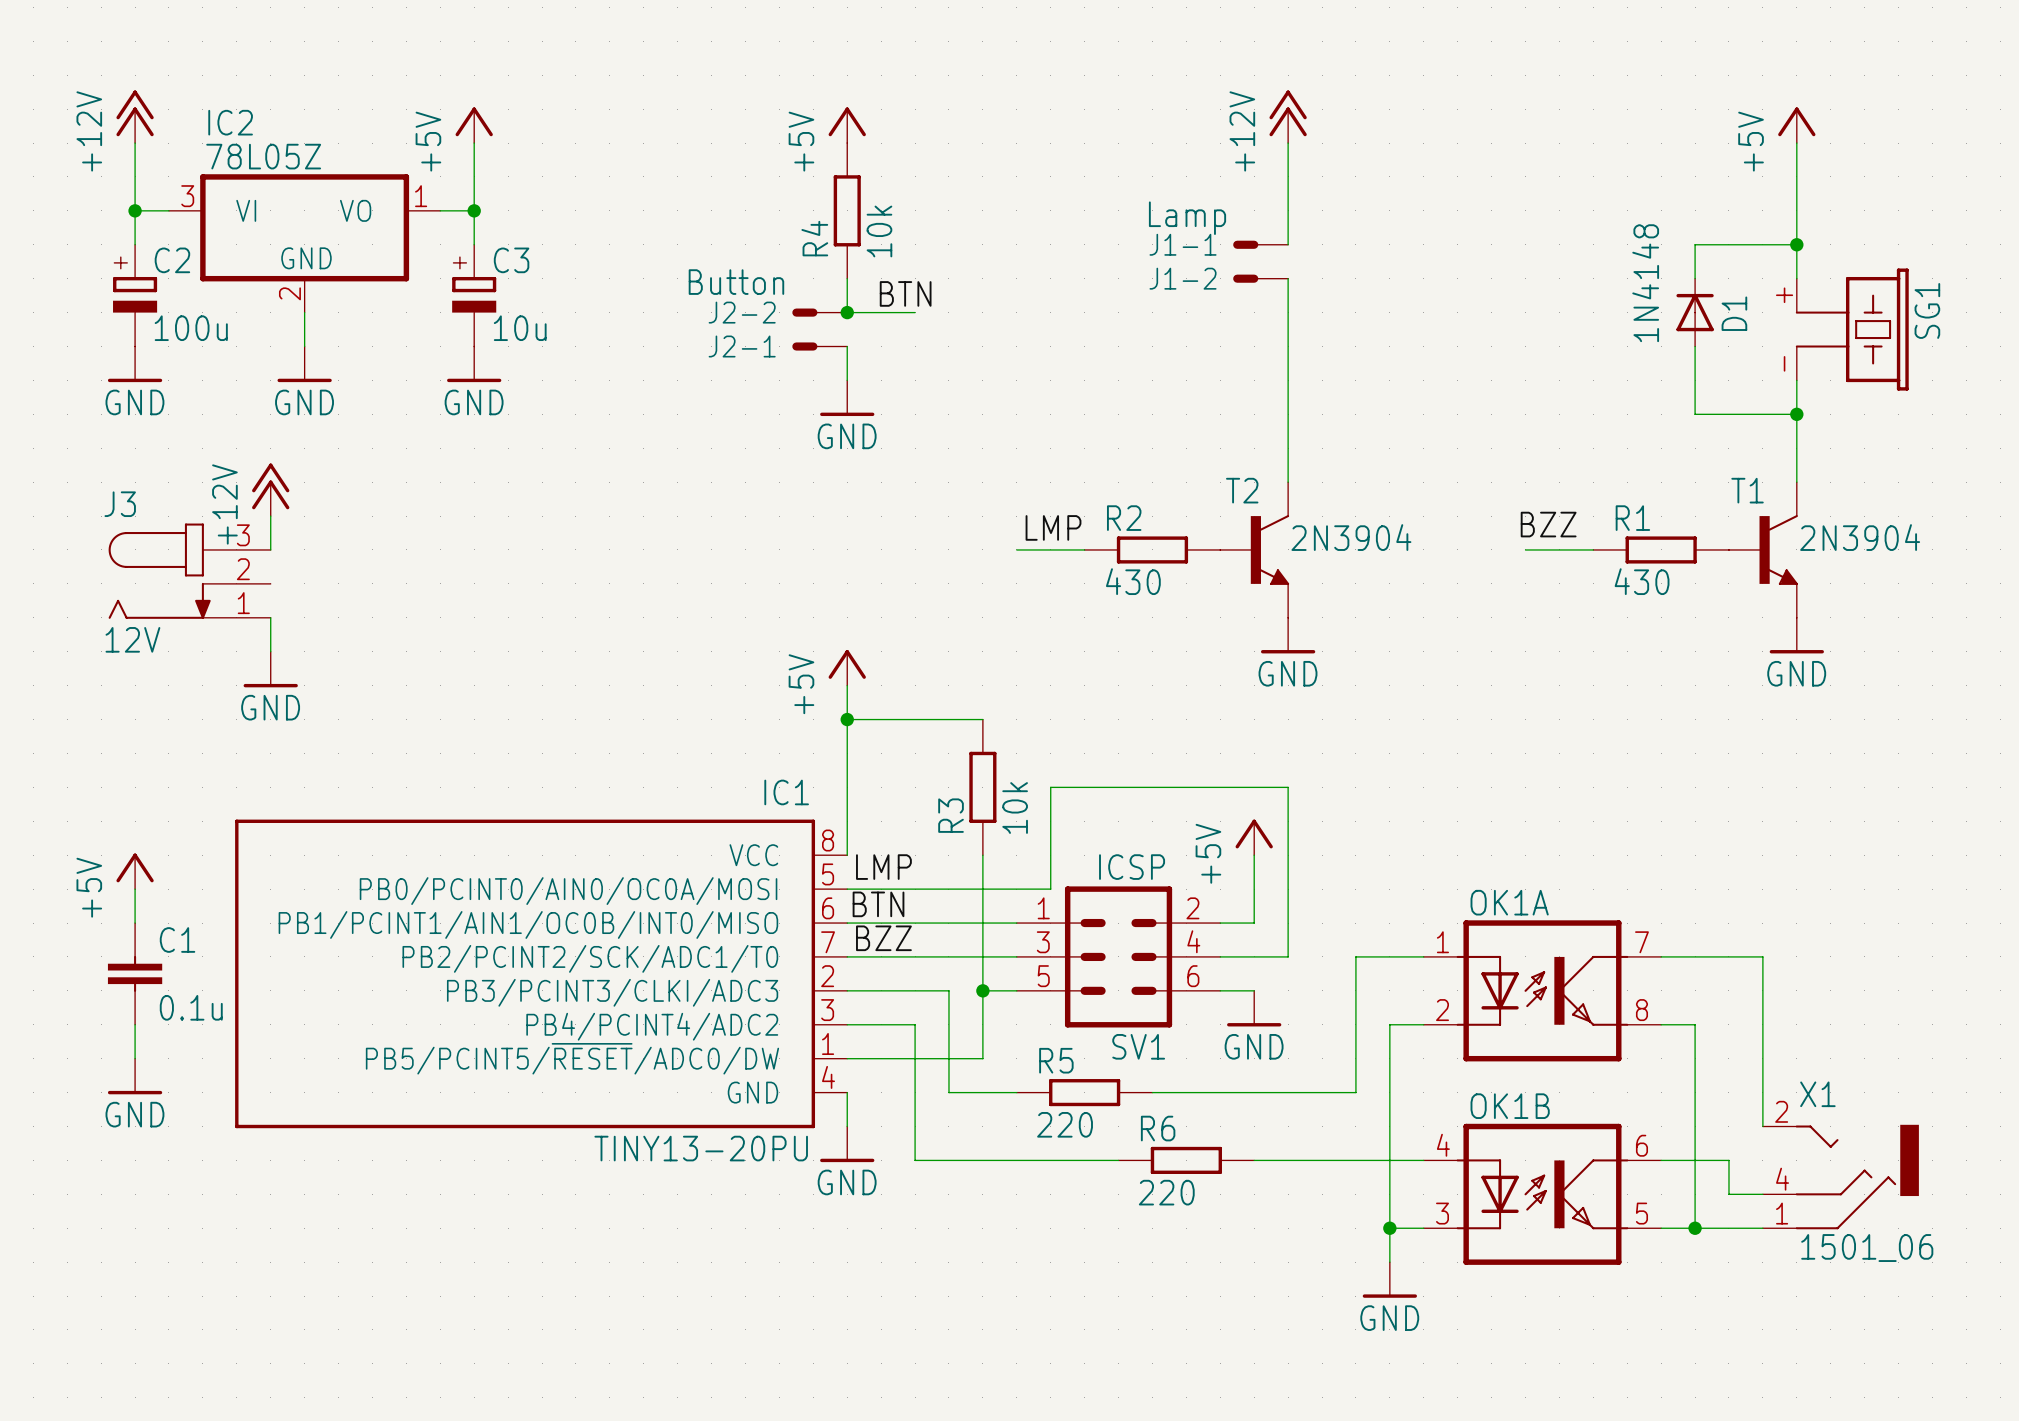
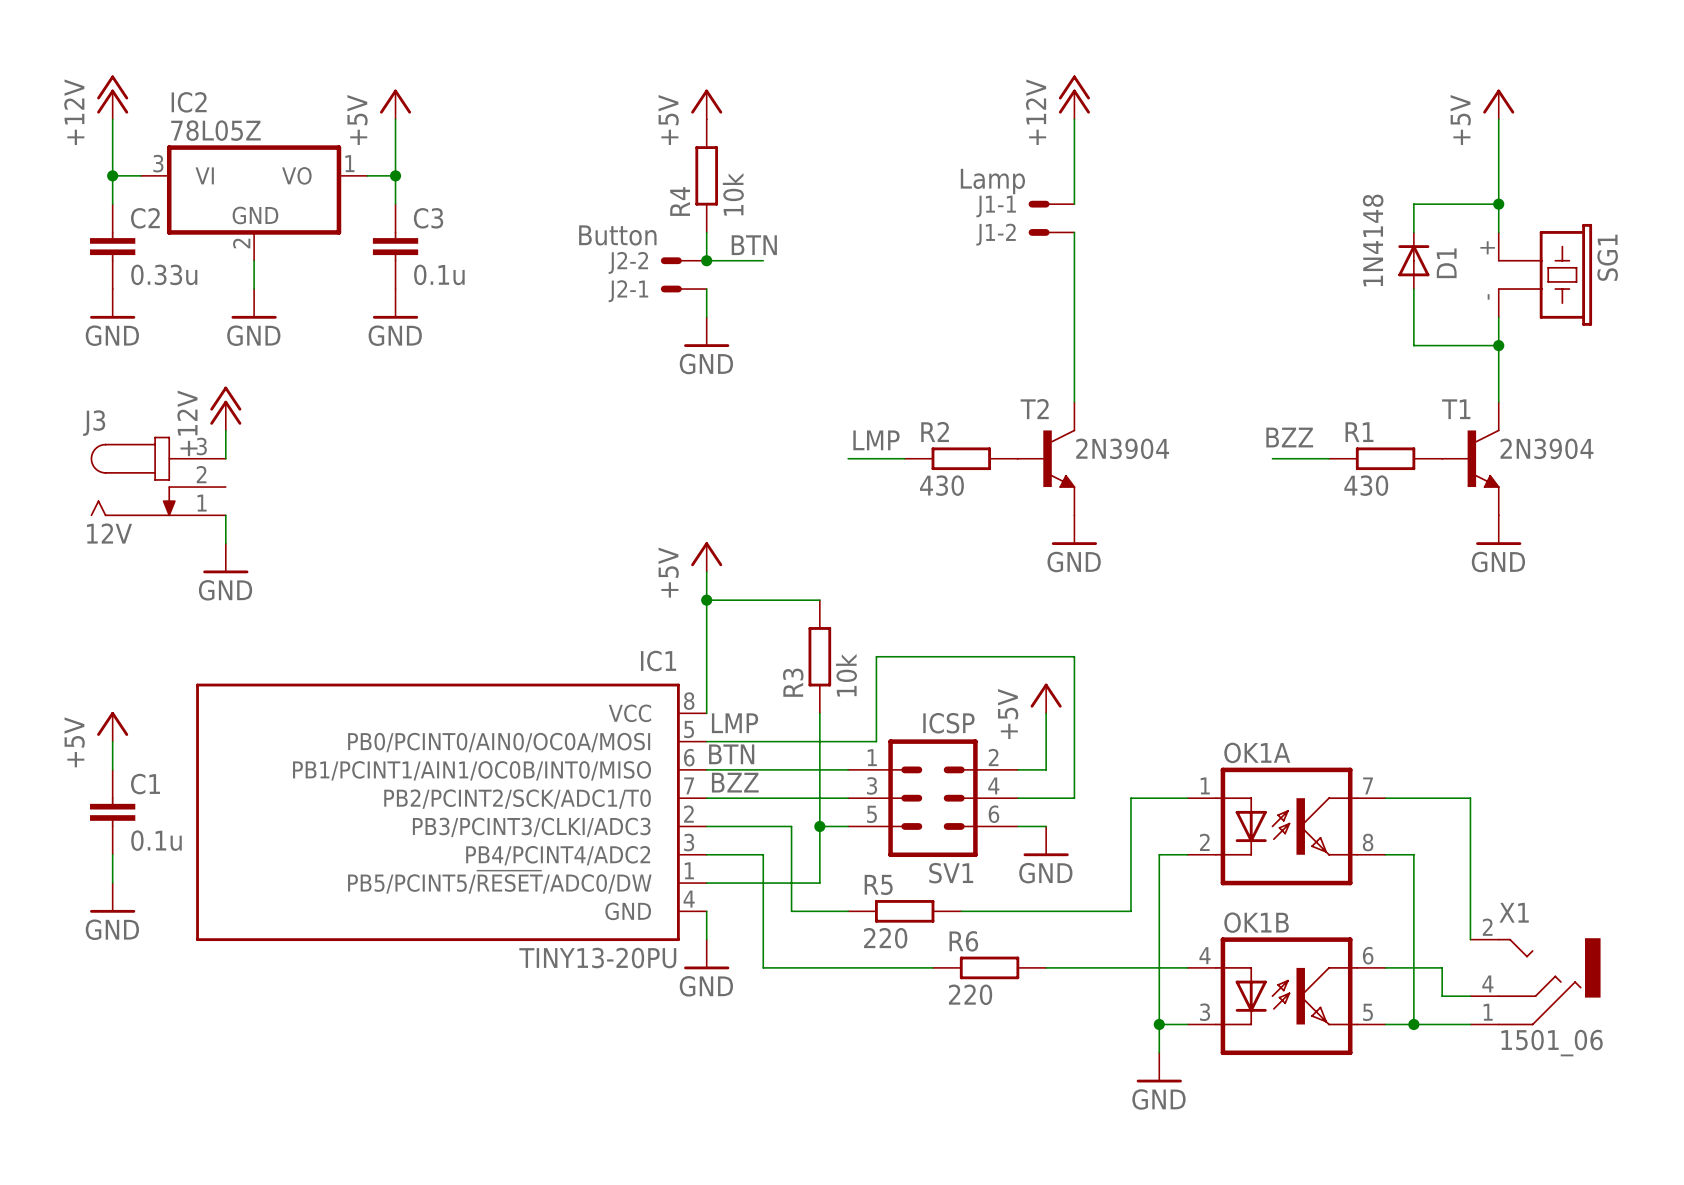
C2 symbol: [113, 244, 158, 347] -> [90, 204, 136, 290]
C3 symbol: [452, 244, 497, 347] -> [372, 204, 419, 290]
C2 value: 100u (191, 328) -> 0.33u (164, 274)
C3 value: 10u (520, 328) -> 0.1u (439, 274)

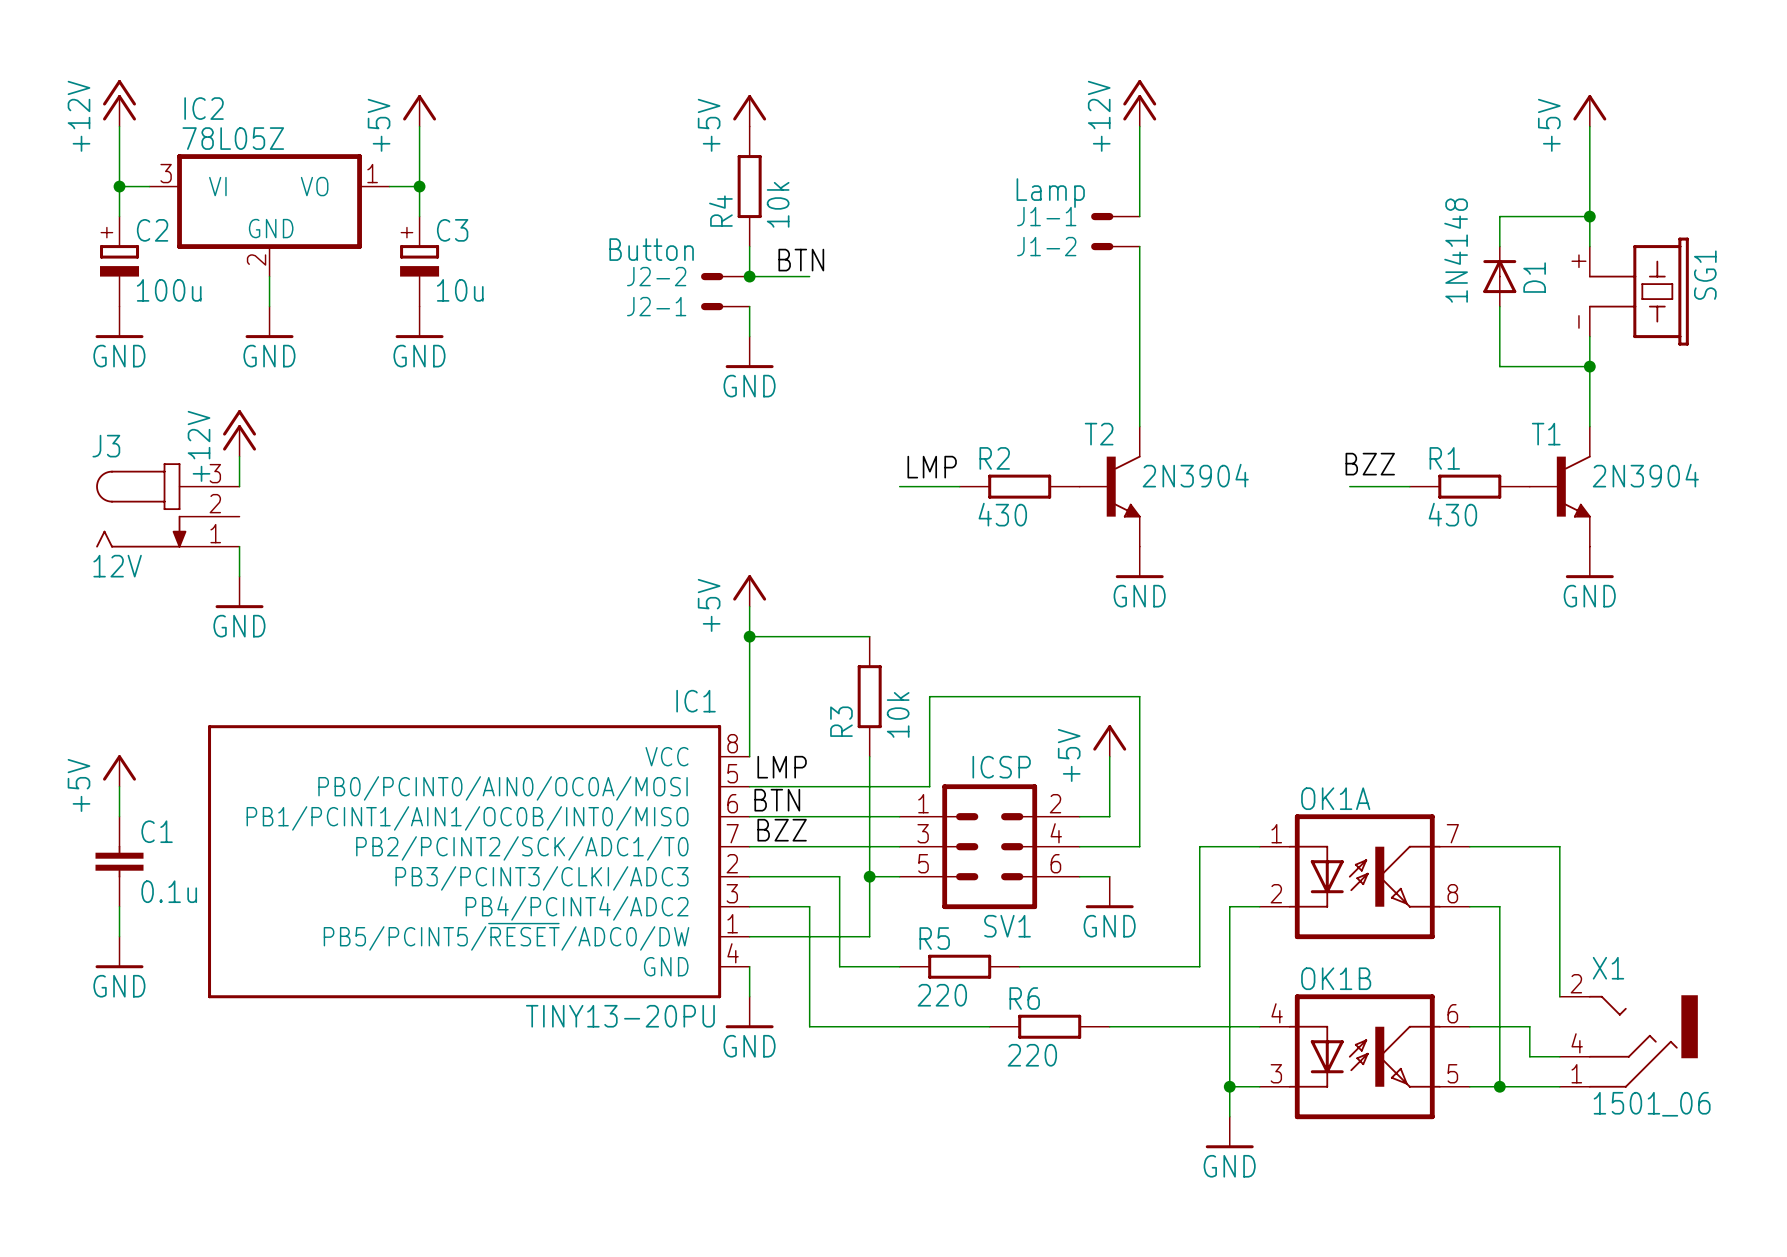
C2 symbol: [90, 204, 136, 290] -> [100, 216, 140, 307]
C3 symbol: [372, 204, 419, 290] -> [400, 216, 440, 307]
C2 value: 0.33u (164, 274) -> 100u (169, 290)
C3 value: 0.1u (439, 274) -> 10u (460, 290)

